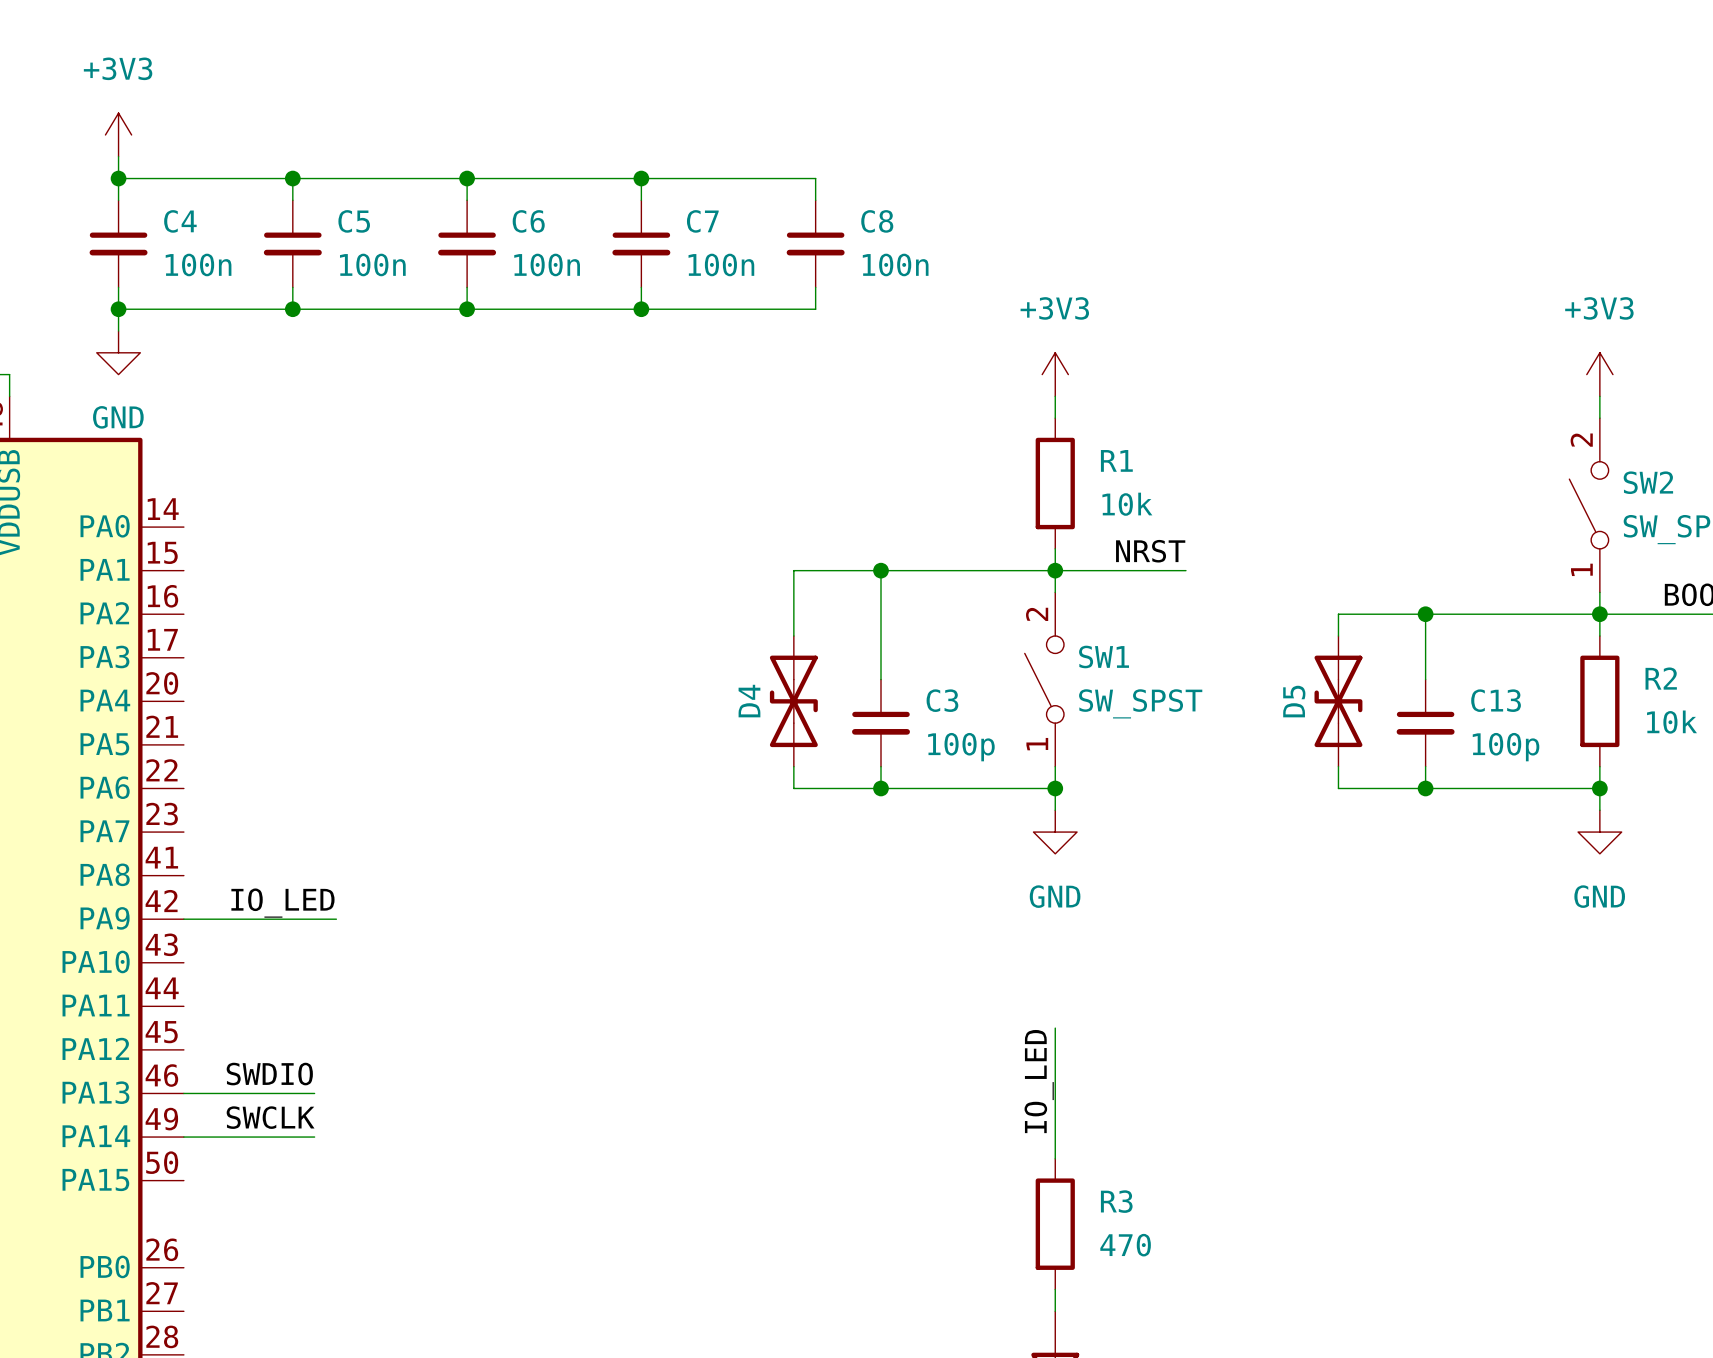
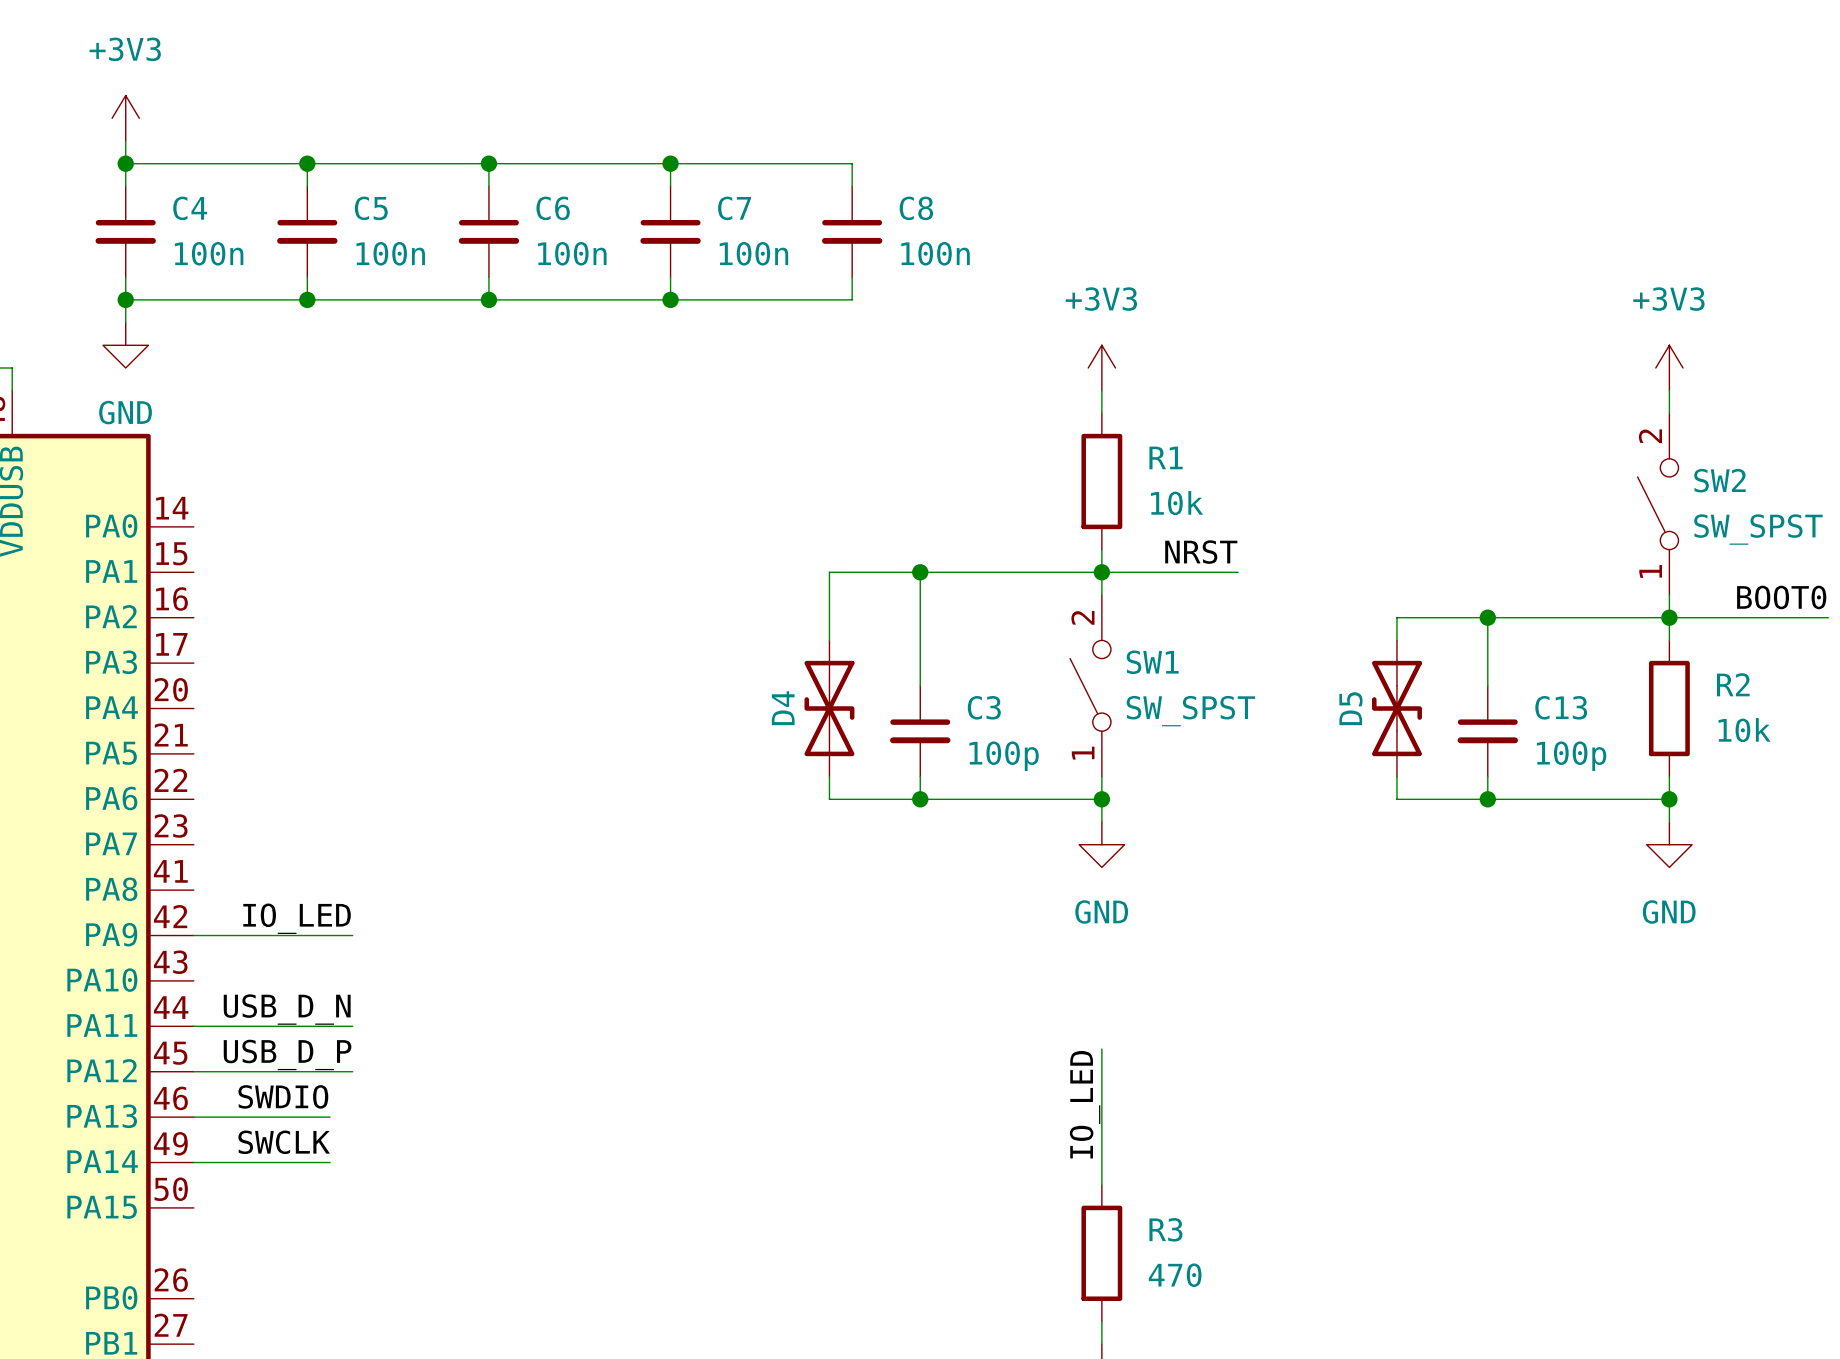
label: none -> USB_D_N (287, 1009)
wire: none -> (193, 1026) (352, 1026)
label: none -> USB_D_P (287, 1054)
wire: none -> (193, 1071) (352, 1071)

